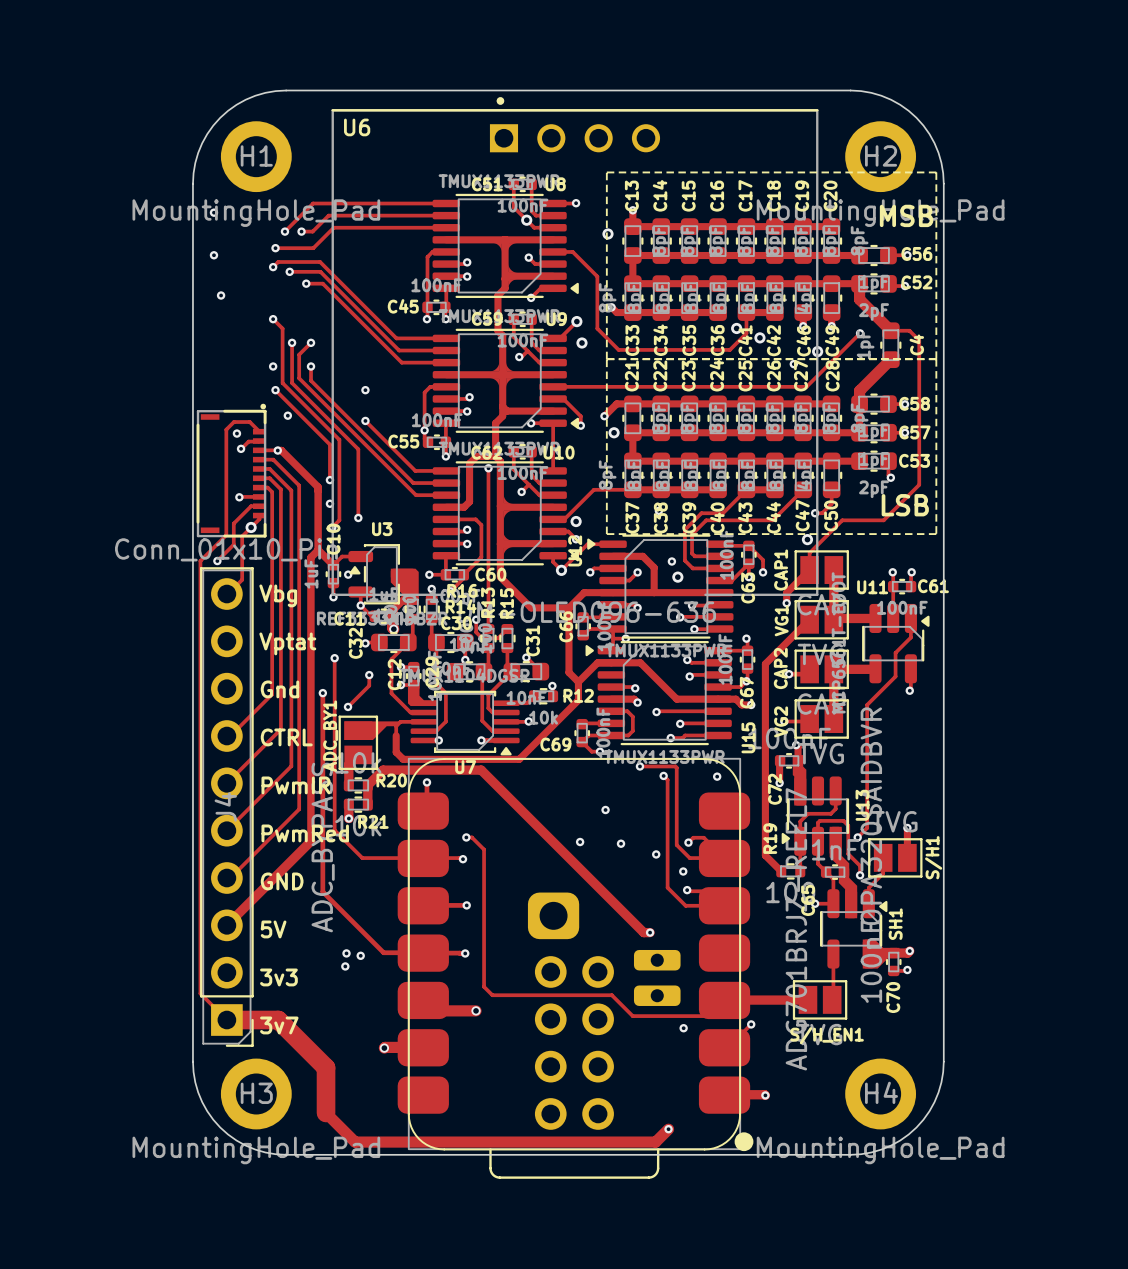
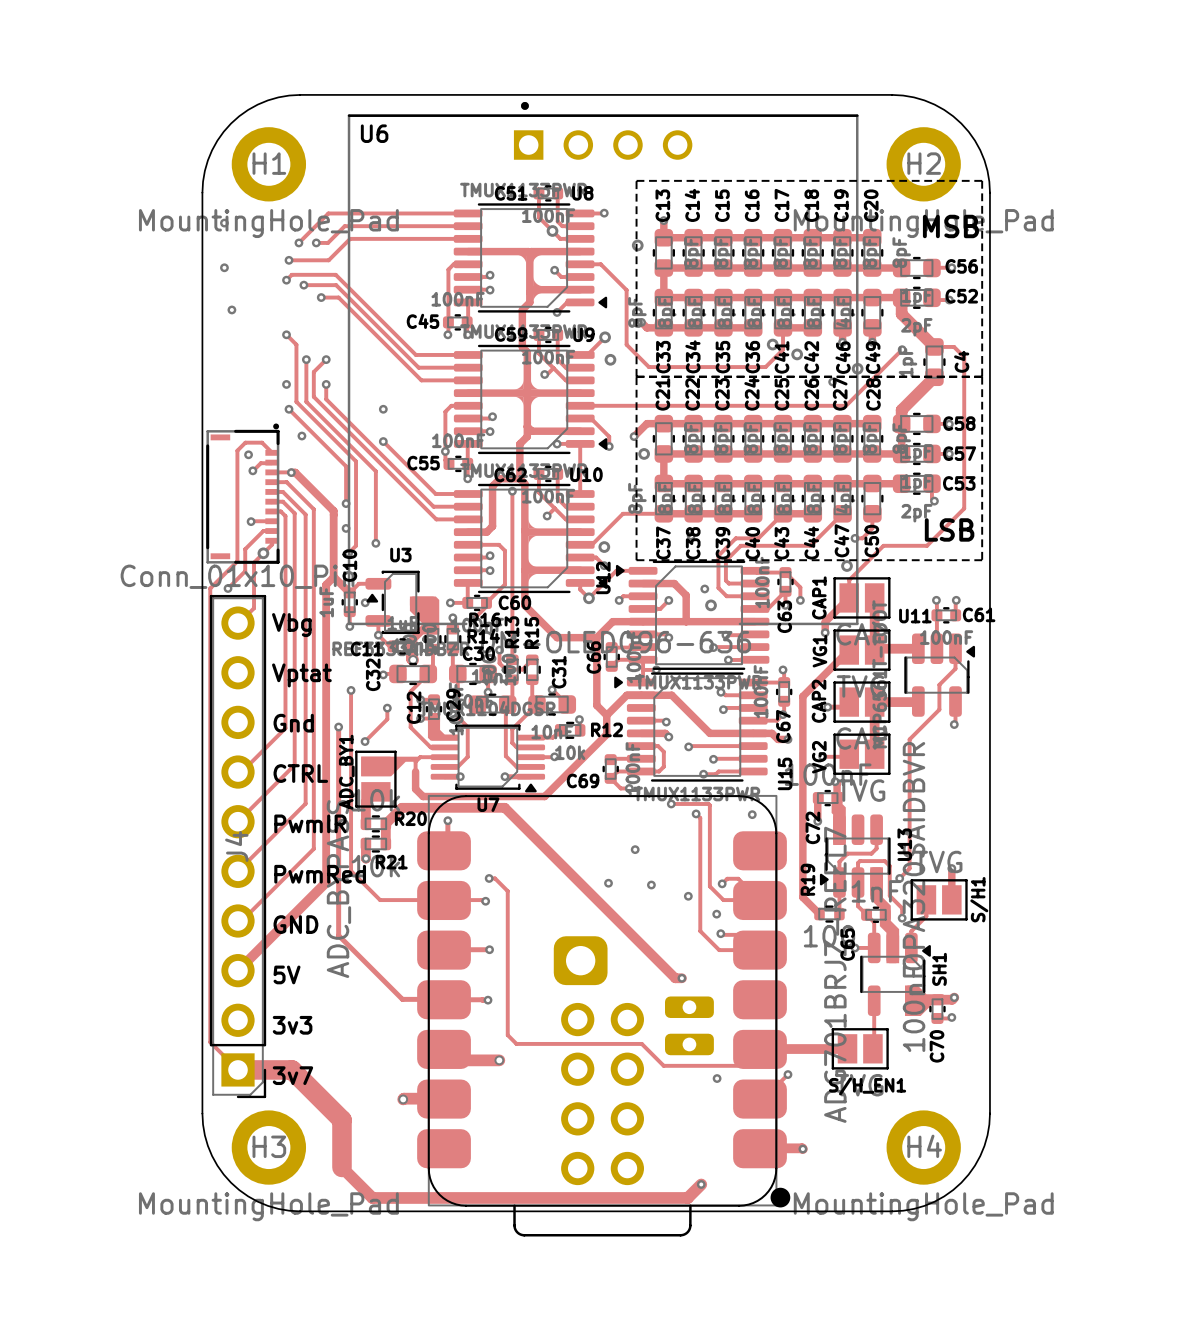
via: (346, 953) -> none
via: (360, 955) -> none
via: (345, 966) -> none

